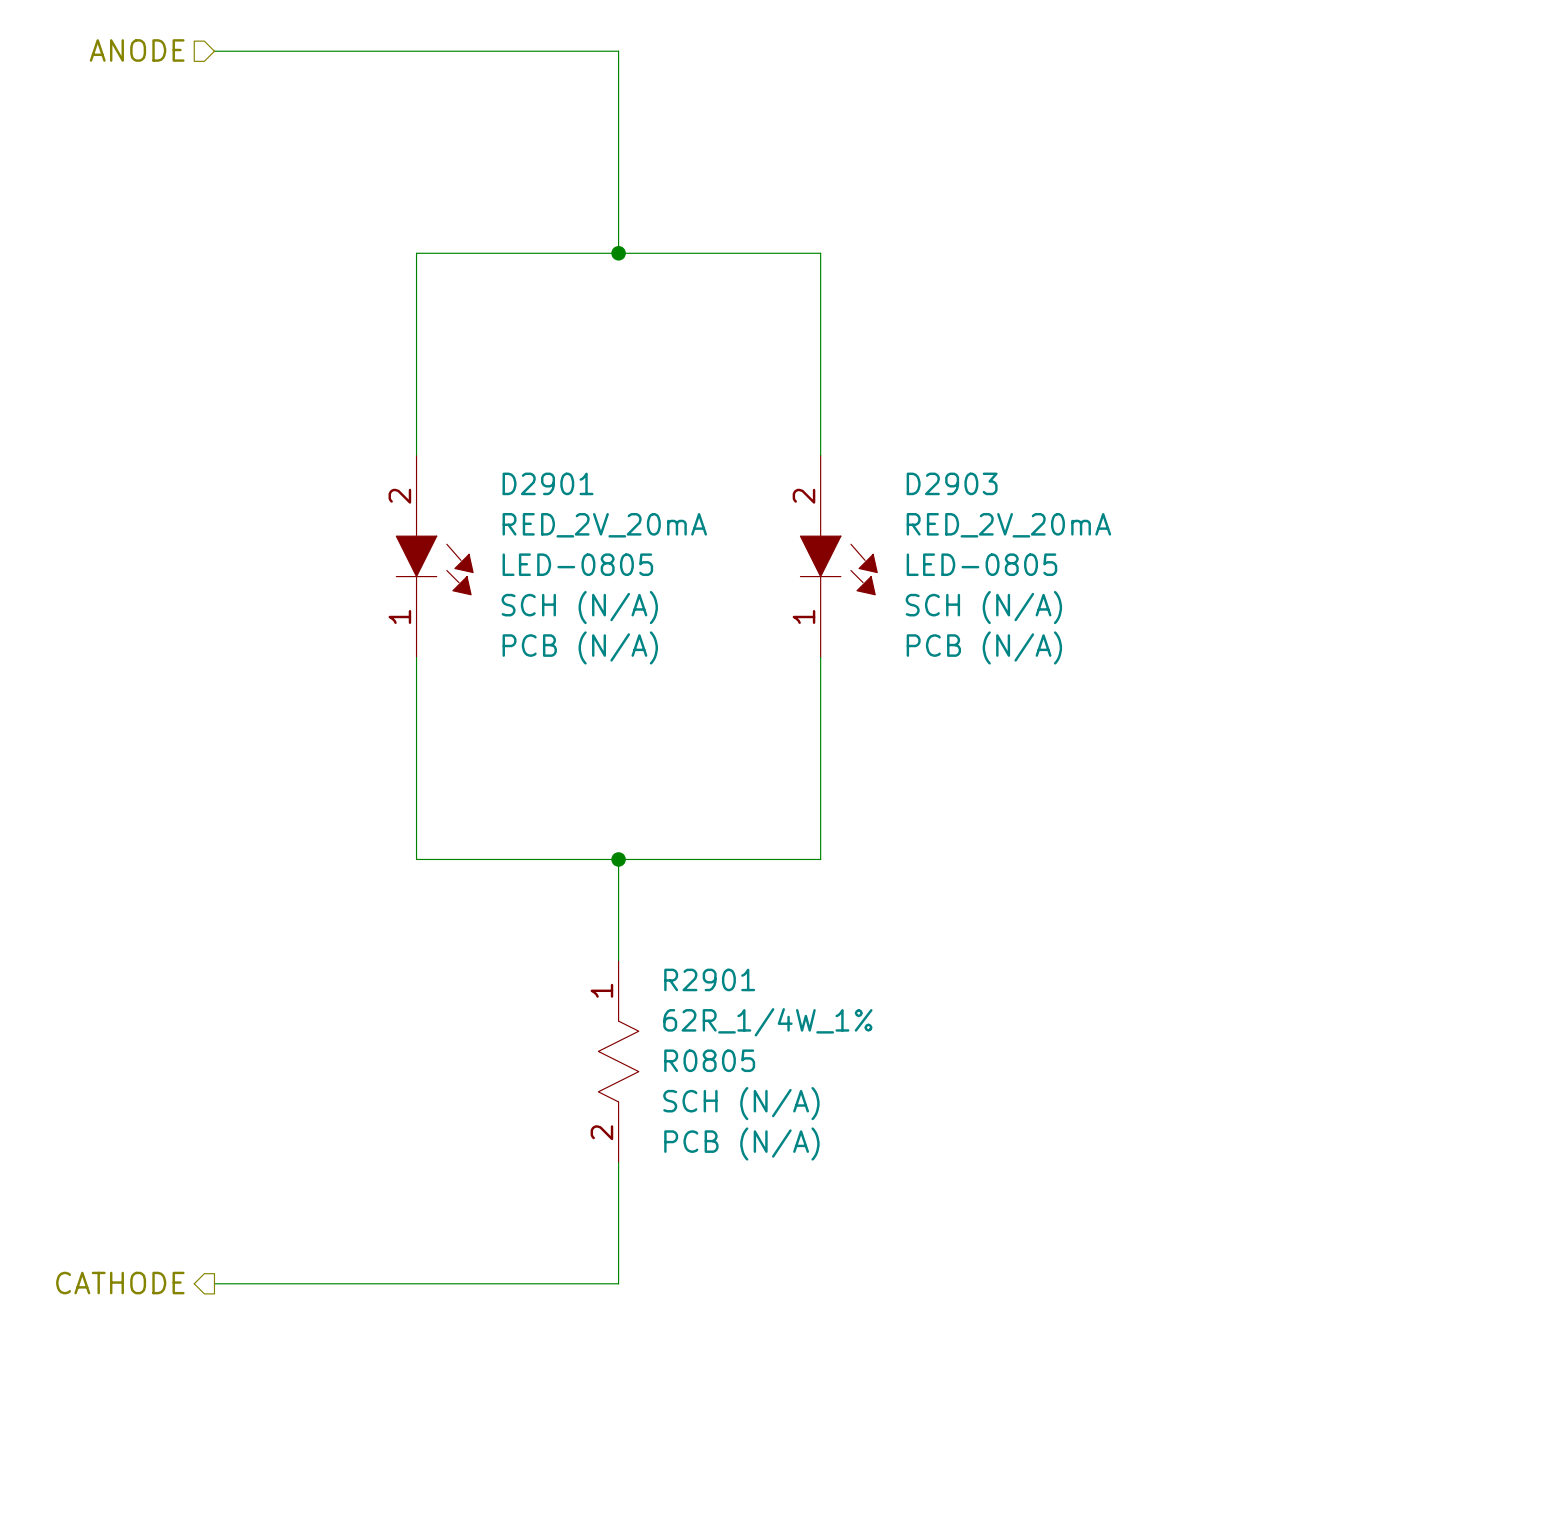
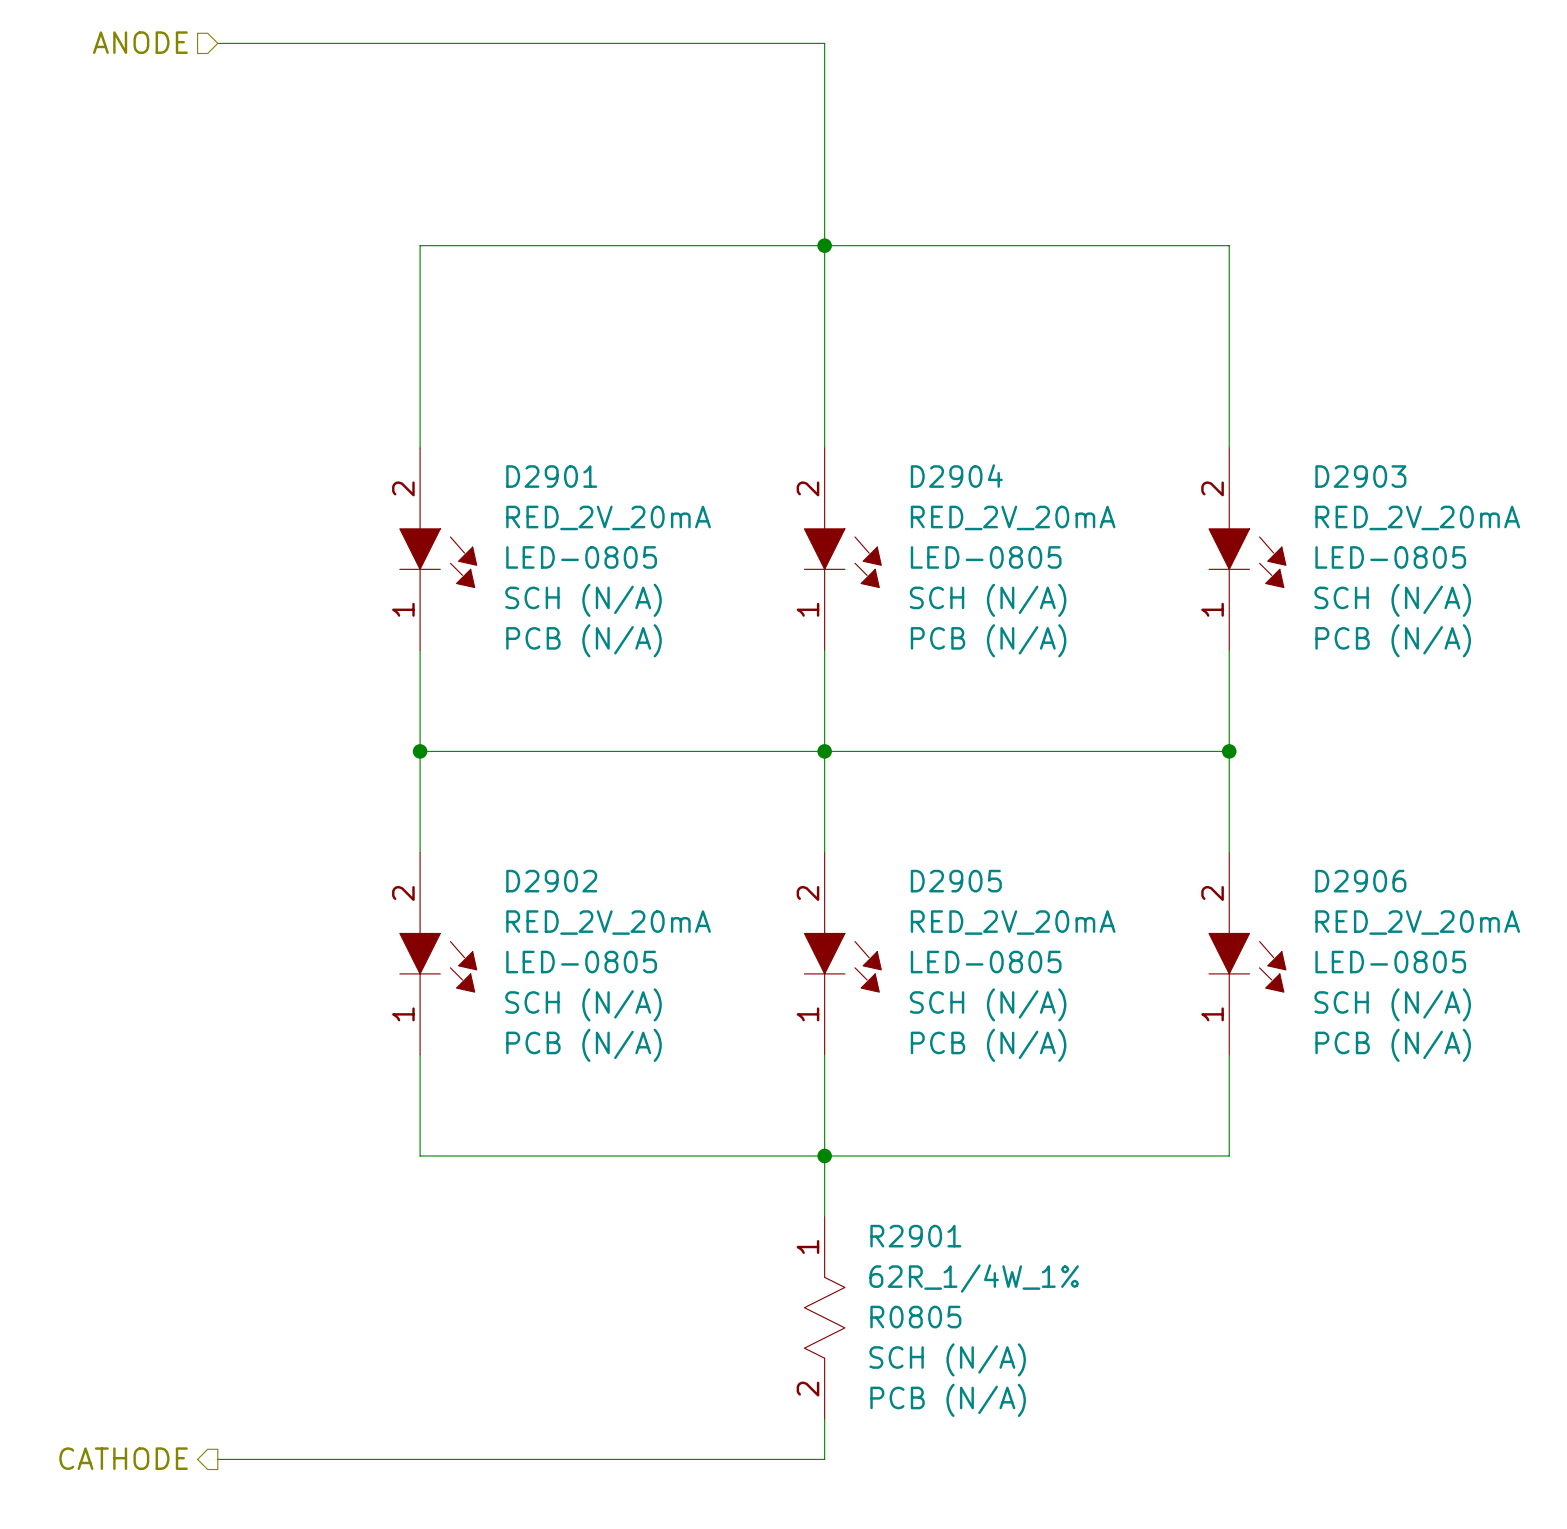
wire: (618, 51) (618, 253) -> (622, 43) (824, 43) (824, 245) (1229, 245) (1229, 447)
junction: (618, 253) -> none
junction: none -> (824, 245)
D2903 name: D2903 (952, 483) -> D2904 (956, 476)
D2903: none -> RED_2V_20mA (1247, 549)
wire: none -> (1229, 650) (1229, 852)
wire: none -> (420, 751) (1229, 751)
junction: none -> (420, 751)
junction: none -> (824, 751)
junction: none -> (1229, 751)
wire: (416, 859) (820, 859) -> none
wire: (618, 859) (618, 960) -> none
junction: (618, 859) -> none
D2902: none -> RED_2V_20mA (438, 953)
D2905: none -> RED_2V_20mA (842, 953)
D2906: none -> RED_2V_20mA (1247, 953)
wire: none -> (420, 1054) (420, 1155) (1229, 1155) (1229, 1054)
R2901 position: (618, 1061) -> (824, 1317)
wire: none -> (824, 1054) (824, 1216)
wire: (618, 1162) (618, 1283) (214, 1283) -> none
junction: none -> (824, 1155)
hierarchical label position: CATHODE (120, 1283) -> CATHODE (123, 1458)
wire: none -> (824, 1418) (824, 1459) (217, 1459)

